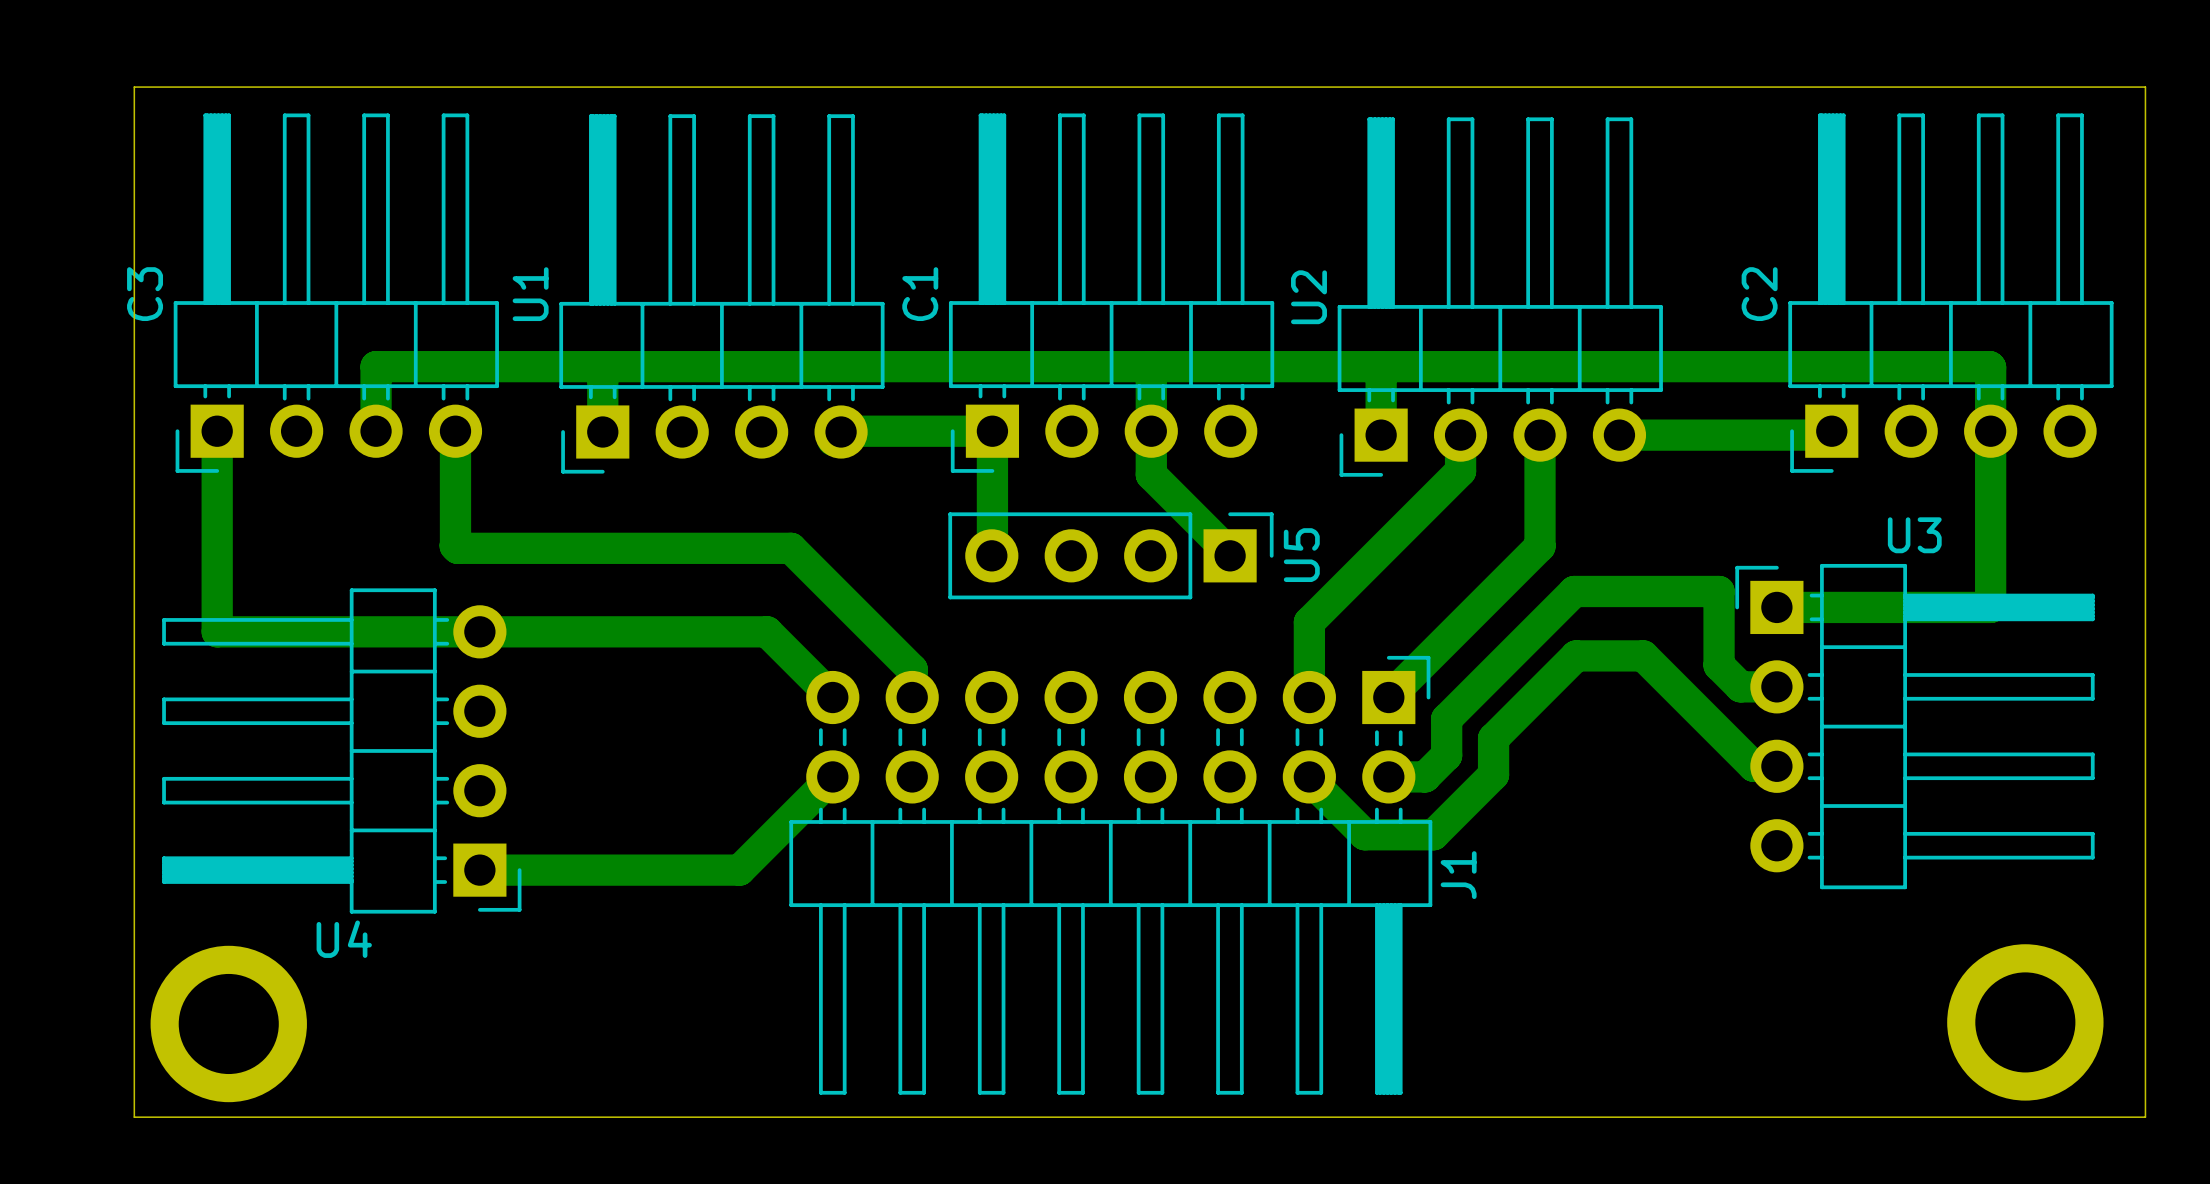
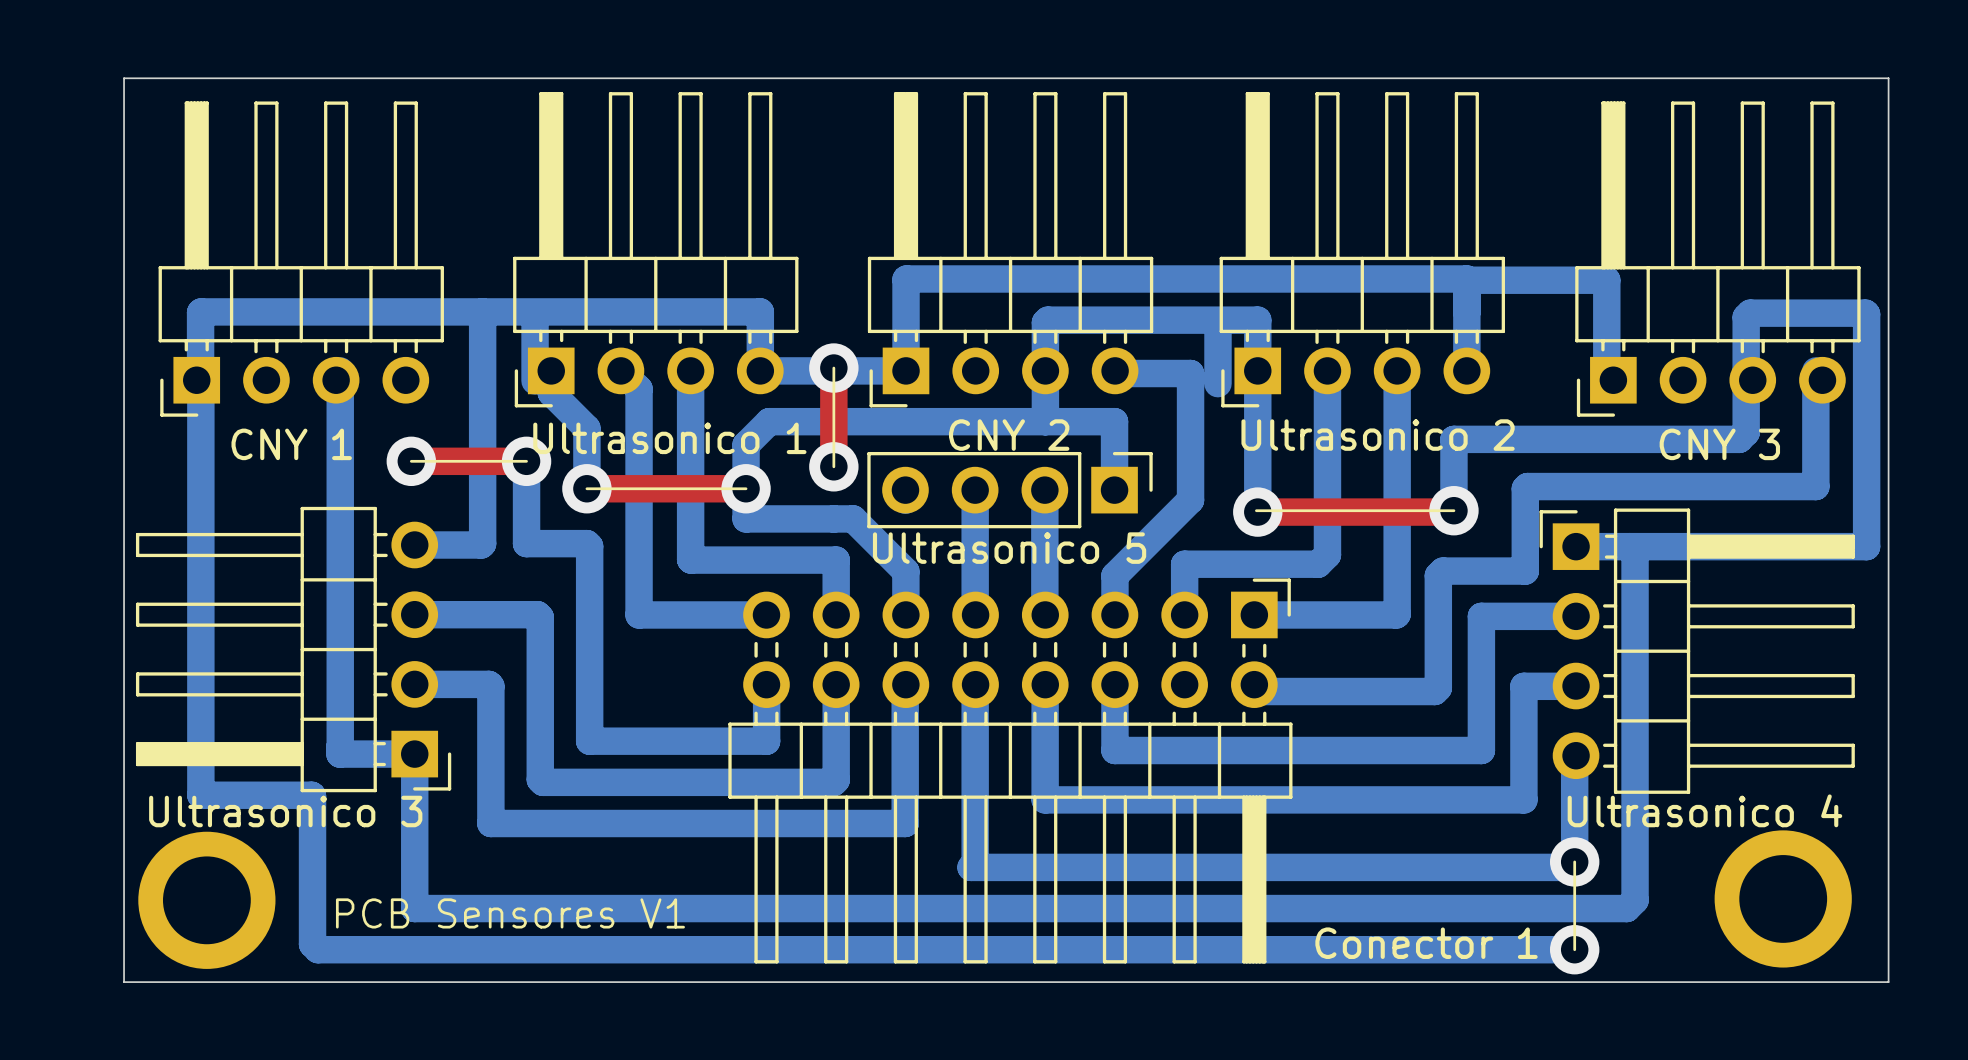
CNY 2: none -> (1010, 249)
Ultrasonico 2: none -> (1362, 249)
U1 position: (721, 293) -> (655, 249)
C1: (1111, 293) -> none
C3 name: C3 (145, 294) -> CNY 1 (291, 444)
U1 name: U1 (530, 294) -> Ultrasonico 1 (669, 438)
C2 name: C2 (1759, 294) -> CNY 3 (1719, 444)
U2: (1500, 297) -> none
bottom track: none -> (1466, 280) (1606, 280) (1606, 370)
bottom track: none -> (482, 311) (482, 543) (414, 545)
bottom track: (1151, 366) (1151, 474) (1230, 553) (1230, 555) -> none
line: none -> (833, 368) (833, 466)
top track: none -> (833, 368) (833, 466)
via: none -> (833, 368)
bottom track: none -> (200, 370) (201, 311) (760, 311) (760, 370) (906, 370) (906, 278) (1466, 278) (1466, 370)
bottom track: none -> (200, 370) (200, 795) (312, 796) (312, 944) (318, 949) (1574, 949)
bottom track: none -> (340, 370) (340, 746)
bottom track: none -> (551, 370) (551, 392) (586, 428) (586, 488)
bottom track: none -> (620, 370) (639, 389) (639, 614) (766, 614)
bottom track: none -> (690, 370) (690, 559) (836, 560) (836, 614)
bottom track: none -> (1115, 370) (1117, 373) (1190, 373) (1190, 500) (1114, 575) (1114, 614)
bottom track: none -> (1327, 370) (1327, 554) (1318, 564) (1184, 564) (1184, 614)
bottom track: none -> (1397, 370) (1397, 614) (1254, 614)
bottom track: none -> (1815, 370) (1815, 486) (1527, 486) (1525, 488) (1525, 571) (1442, 571) (1438, 575) (1438, 687) (1434, 691) (1256, 691)
bottom track: (217, 431) (217, 631) (767, 631) (832, 697) -> none
bottom track: (376, 431) (376, 366) (1989, 366) (1990, 607) (1776, 607) -> none
bottom track: (455, 431) (455, 545) -> none
bottom track: (1831, 431) (1827, 435) (1619, 435) -> none
bottom track: (1460, 435) (1460, 471) (1309, 622) (1309, 697) -> none
bottom track: (1540, 435) (1540, 546) (1388, 697) -> none
bottom track: (832, 440) (841, 431) (992, 431) (991, 555) -> none
bottom track: none -> (1045, 421) (1045, 322) (1047, 320) (1257, 320) (1257, 512)
line: none -> (411, 461) (526, 461)
top track: none -> (411, 461) (526, 461)
via: none -> (411, 461)
bottom track: none -> (526, 461) (526, 543) (586, 543) (589, 546) (589, 741) (766, 741) (766, 684)
via: none -> (526, 461)
via: none -> (833, 466)
U3 name: U3 (1914, 535) -> Ultrasonico 4 (1704, 810)
bottom track: (455, 545) (457, 548) (791, 548) (912, 669) (912, 697) -> none
line: none -> (586, 488) (746, 488)
top track: none -> (586, 488) (746, 488)
via: none -> (586, 488)
via: none -> (746, 488)
U5: (1110, 555) -> none
bottom track: none -> (975, 490) (975, 619)
Ultrasonico 5: none -> (1010, 490)
bottom track: none -> (1044, 490) (1045, 619)
bottom track: none -> (1114, 490) (1114, 421) (769, 421) (746, 444) (746, 518) (853, 518) (905, 571) (905, 614)
line: none -> (1256, 510) (1453, 510)
bottom track: none -> (1453, 510) (1453, 439) (1739, 439) (1746, 432) (1746, 317) (1750, 313) (1866, 314) (1866, 546) (1576, 546)
top track: none -> (1453, 510) (1257, 512)
via: none -> (1453, 510)
via: none -> (1257, 512)
bottom track: none -> (1629, 546) (1635, 552) (1635, 900) (1626, 908) (414, 908) (414, 754) (339, 754) (339, 747)
bottom track: (1776, 686) (1740, 686) (1719, 665) (1719, 591) (1574, 591) (1446, 719) (1446, 755) (1425, 776) (1388, 776) -> none
bottom track: none -> (414, 614) (537, 614) (540, 617) (540, 779) (543, 782) (833, 782) (836, 780) (836, 684)
bottom track: none -> (1576, 616) (1481, 616) (1481, 750) (1114, 750) (1114, 684)
U3 position: (1914, 726) -> (1697, 651)
U4 position: (341, 750) -> (293, 649)
bottom track: (1776, 766) (1753, 766) (1643, 655) (1576, 655) (1493, 738) (1493, 774) (1433, 834) (1364, 834) (1309, 779) (1309, 776) -> none
bottom track: (832, 776) (739, 870) (479, 870) -> none
bottom track: none -> (414, 684) (488, 684) (490, 686) (490, 823) (905, 823) (905, 684)
bottom track: none -> (975, 684) (975, 863) (971, 867) (1574, 867) (1574, 754)
bottom track: none -> (1045, 684) (1045, 799) (1523, 799) (1523, 686) (1575, 686)
J1: (1110, 875) -> none
Conector 1: none -> (1010, 770)
U4 name: U4 (344, 939) -> Ultrasonico 3 (285, 811)
line: none -> (1574, 861) (1574, 949)
via: none -> (1574, 861)
text: none -> PCB Sensores V1 (510, 913)
via: none -> (1574, 949)

